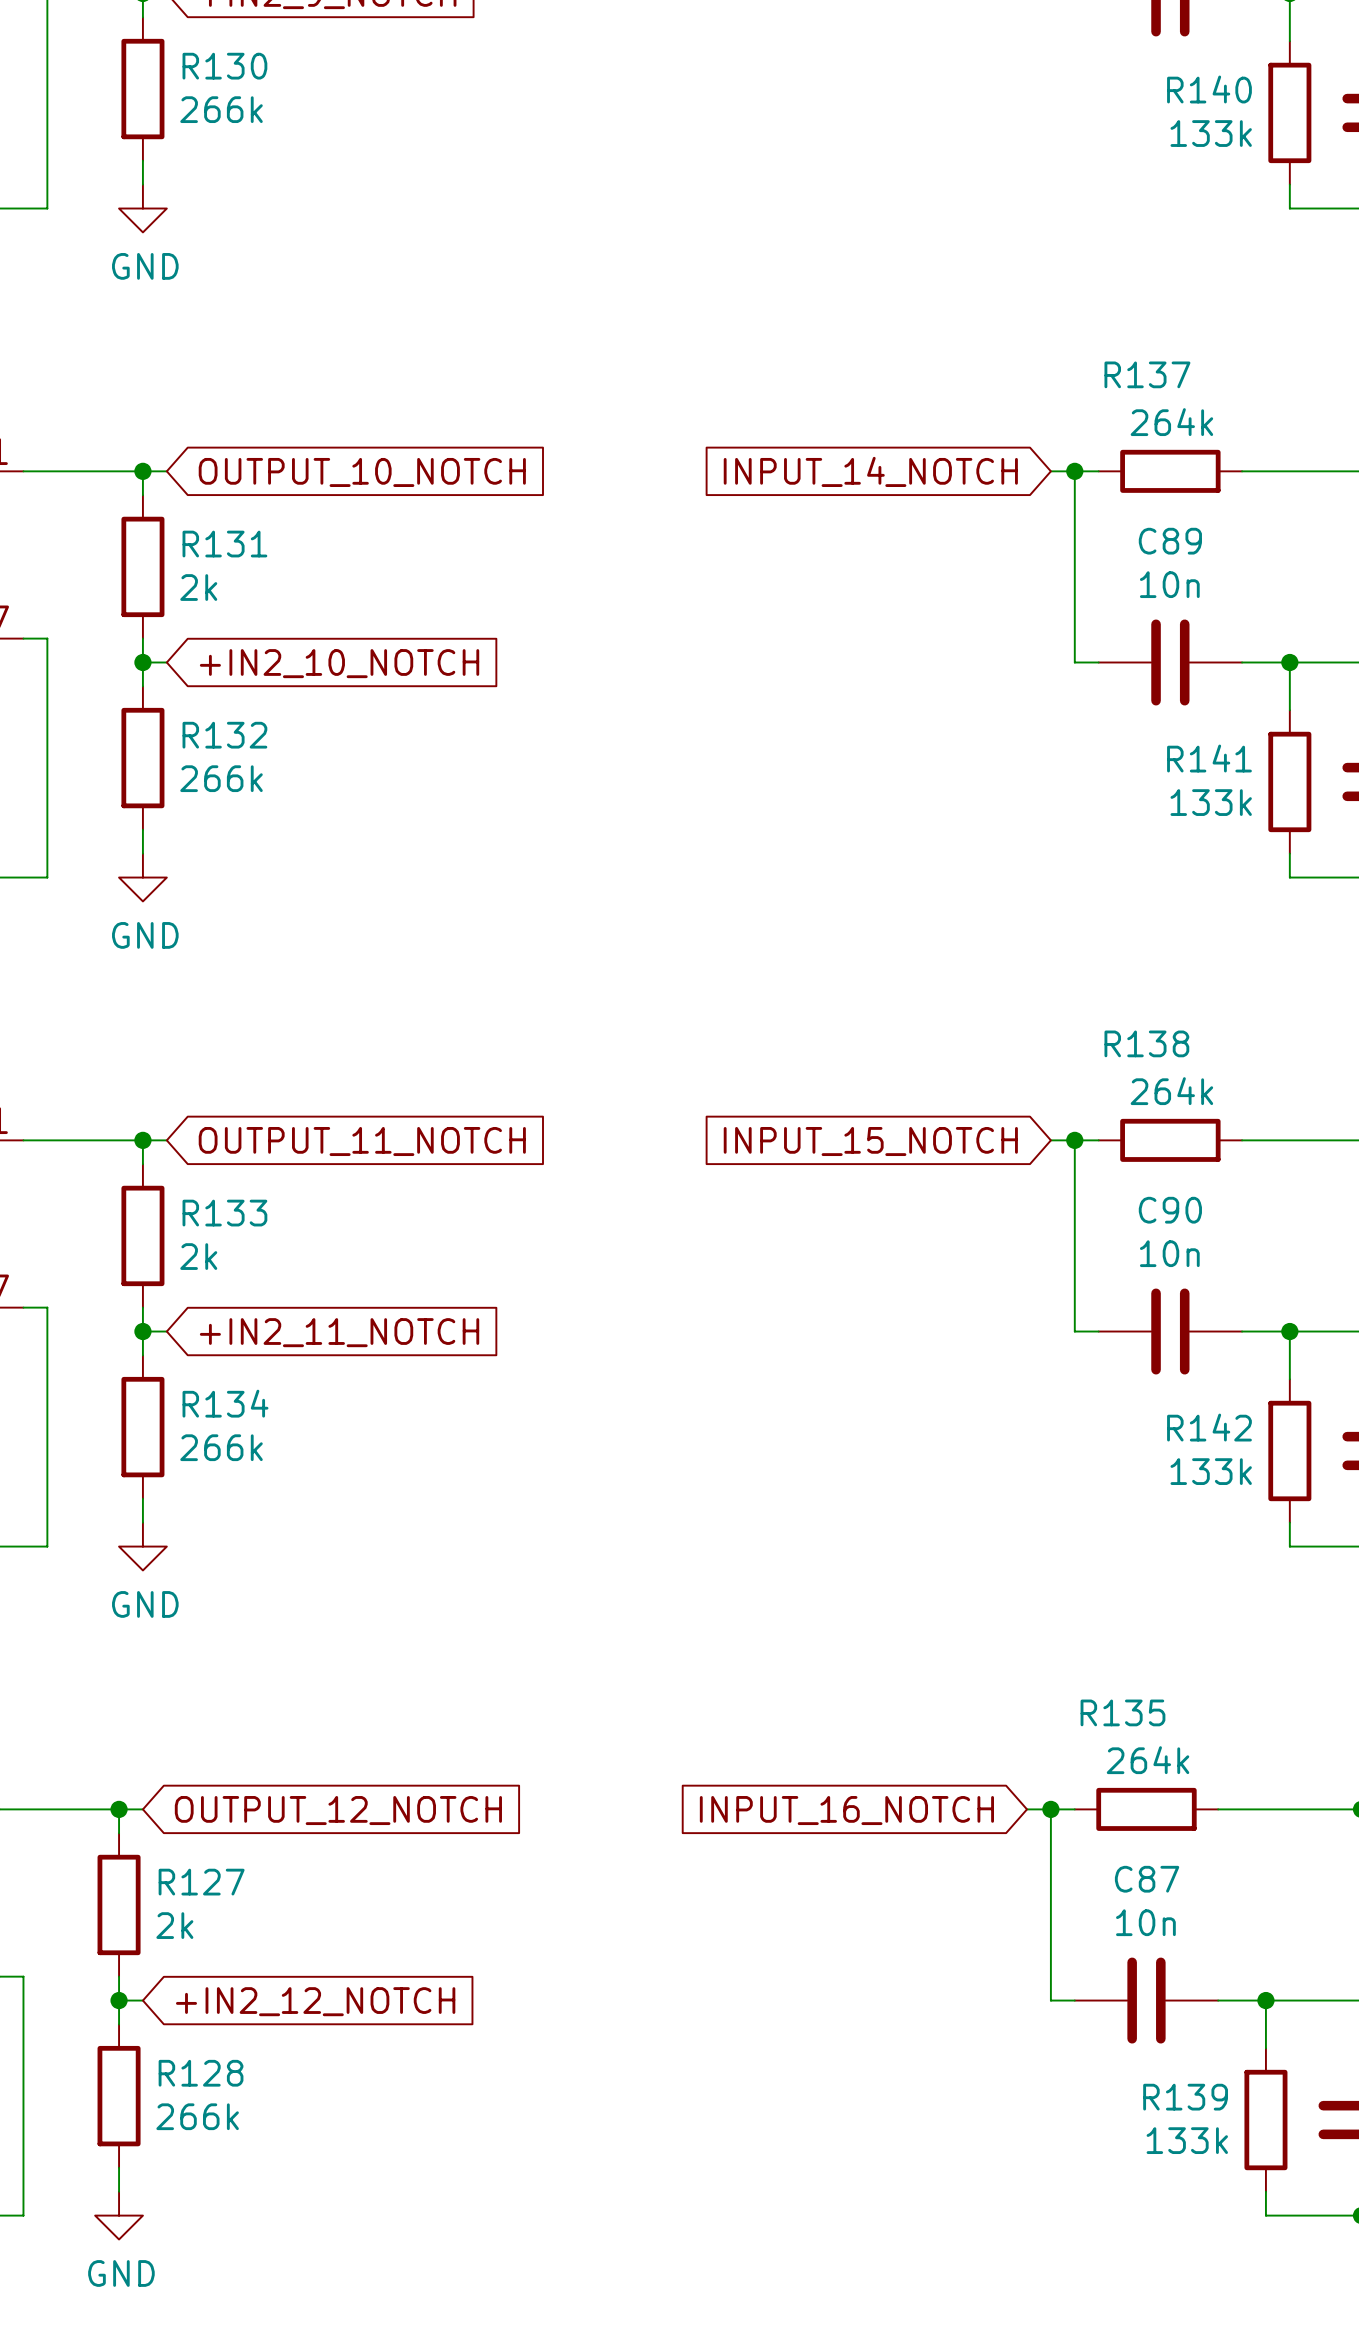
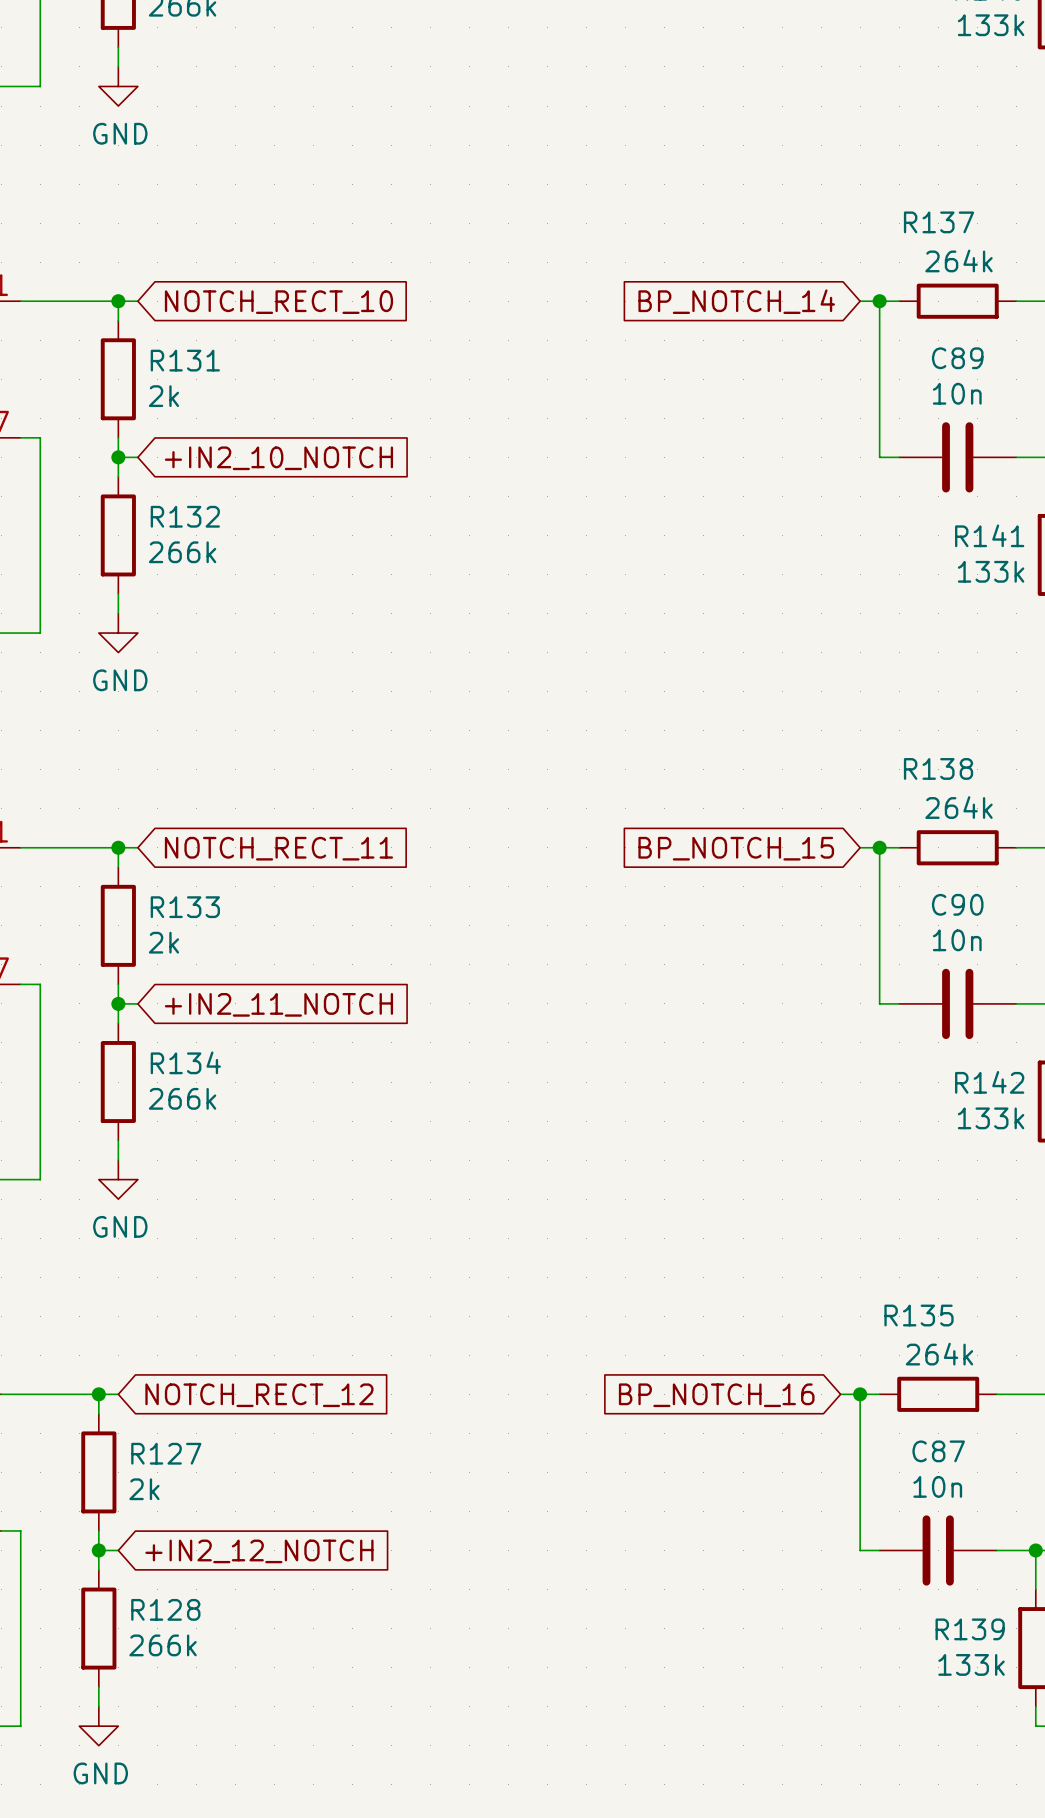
global label: INPUT_14_NOTCH (870, 471) -> BP_NOTCH_14 (736, 301)
global label: OUTPUT_10_NOTCH (362, 472) -> NOTCH_RECT_10 (278, 302)
global label: OUTPUT_11_NOTCH (362, 1141) -> NOTCH_RECT_11 (278, 848)
global label: INPUT_15_NOTCH (870, 1141) -> BP_NOTCH_15 (736, 848)
global label: OUTPUT_12_NOTCH (338, 1810) -> NOTCH_RECT_12 (259, 1395)
global label: INPUT_16_NOTCH (846, 1810) -> BP_NOTCH_16 (716, 1395)

